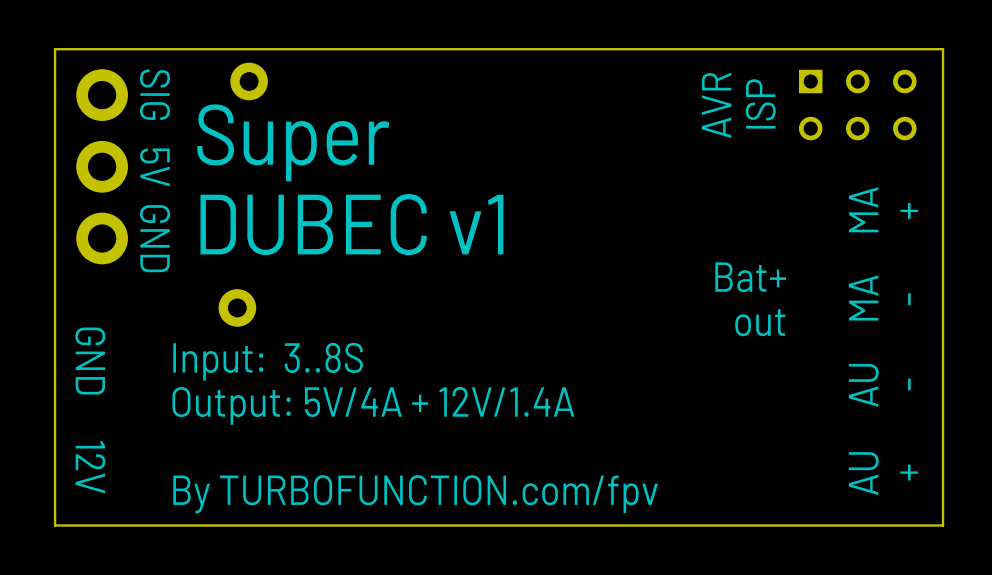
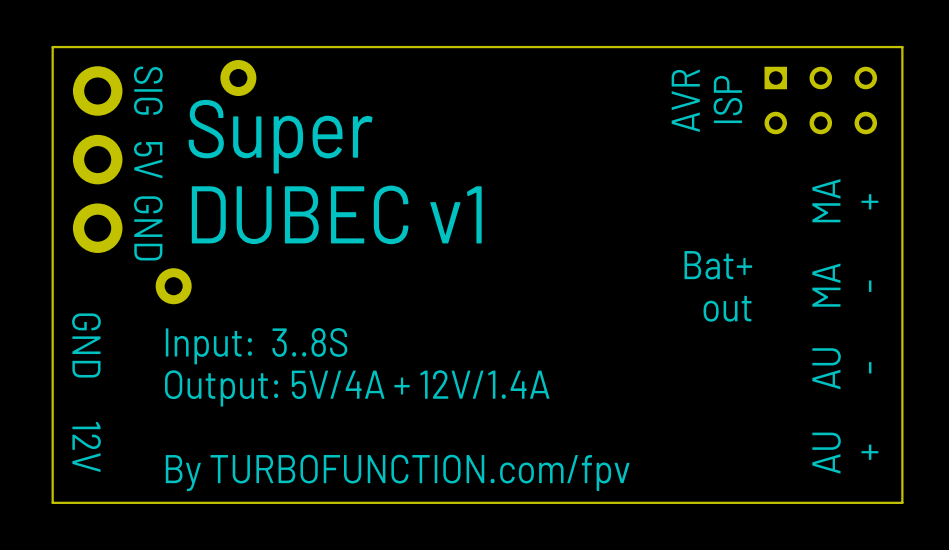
part position: (237, 307) -> (173, 286)

